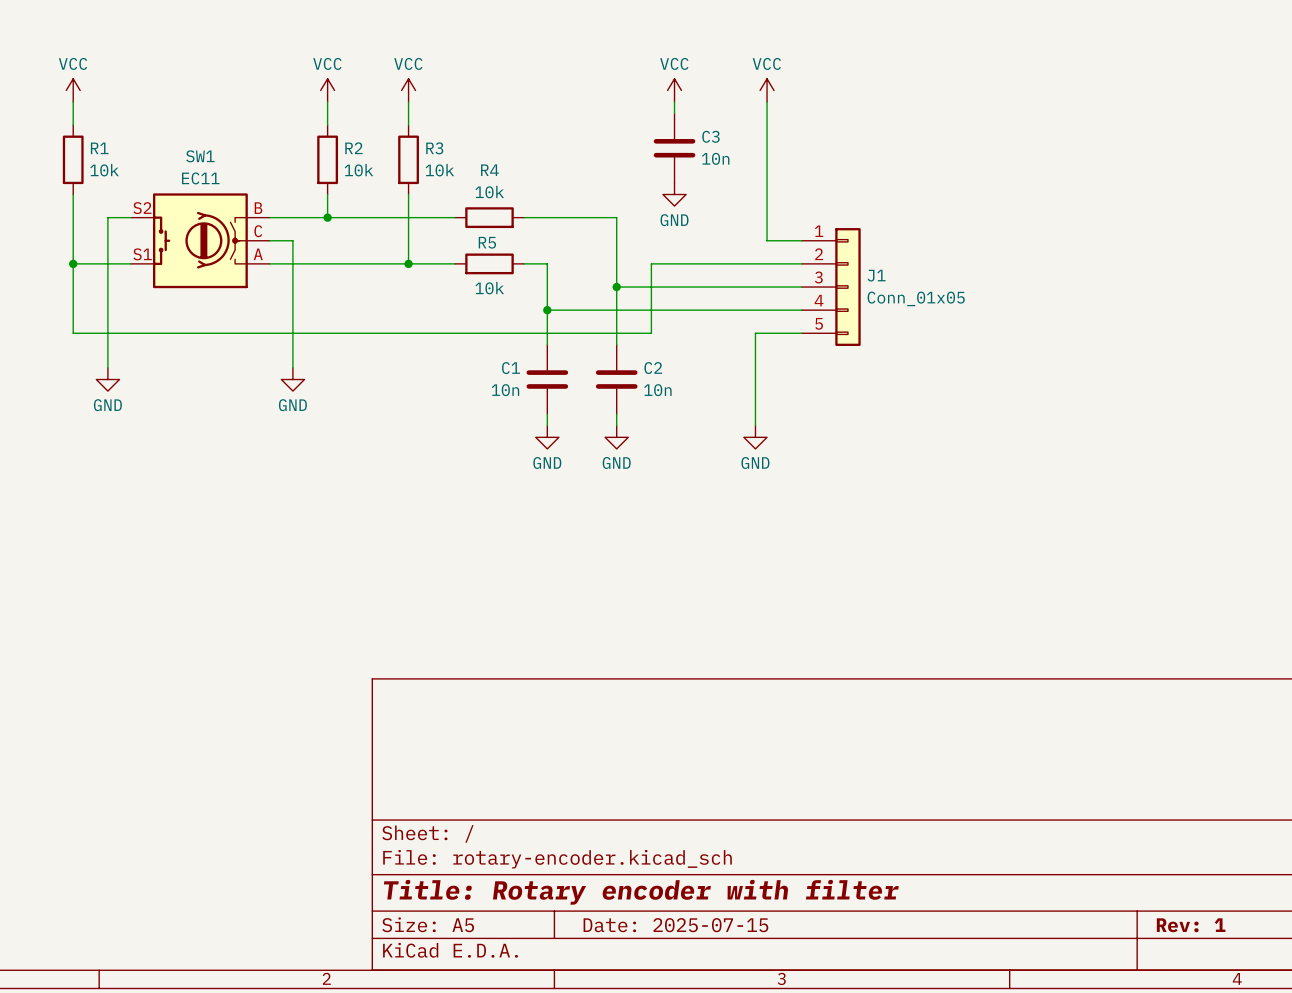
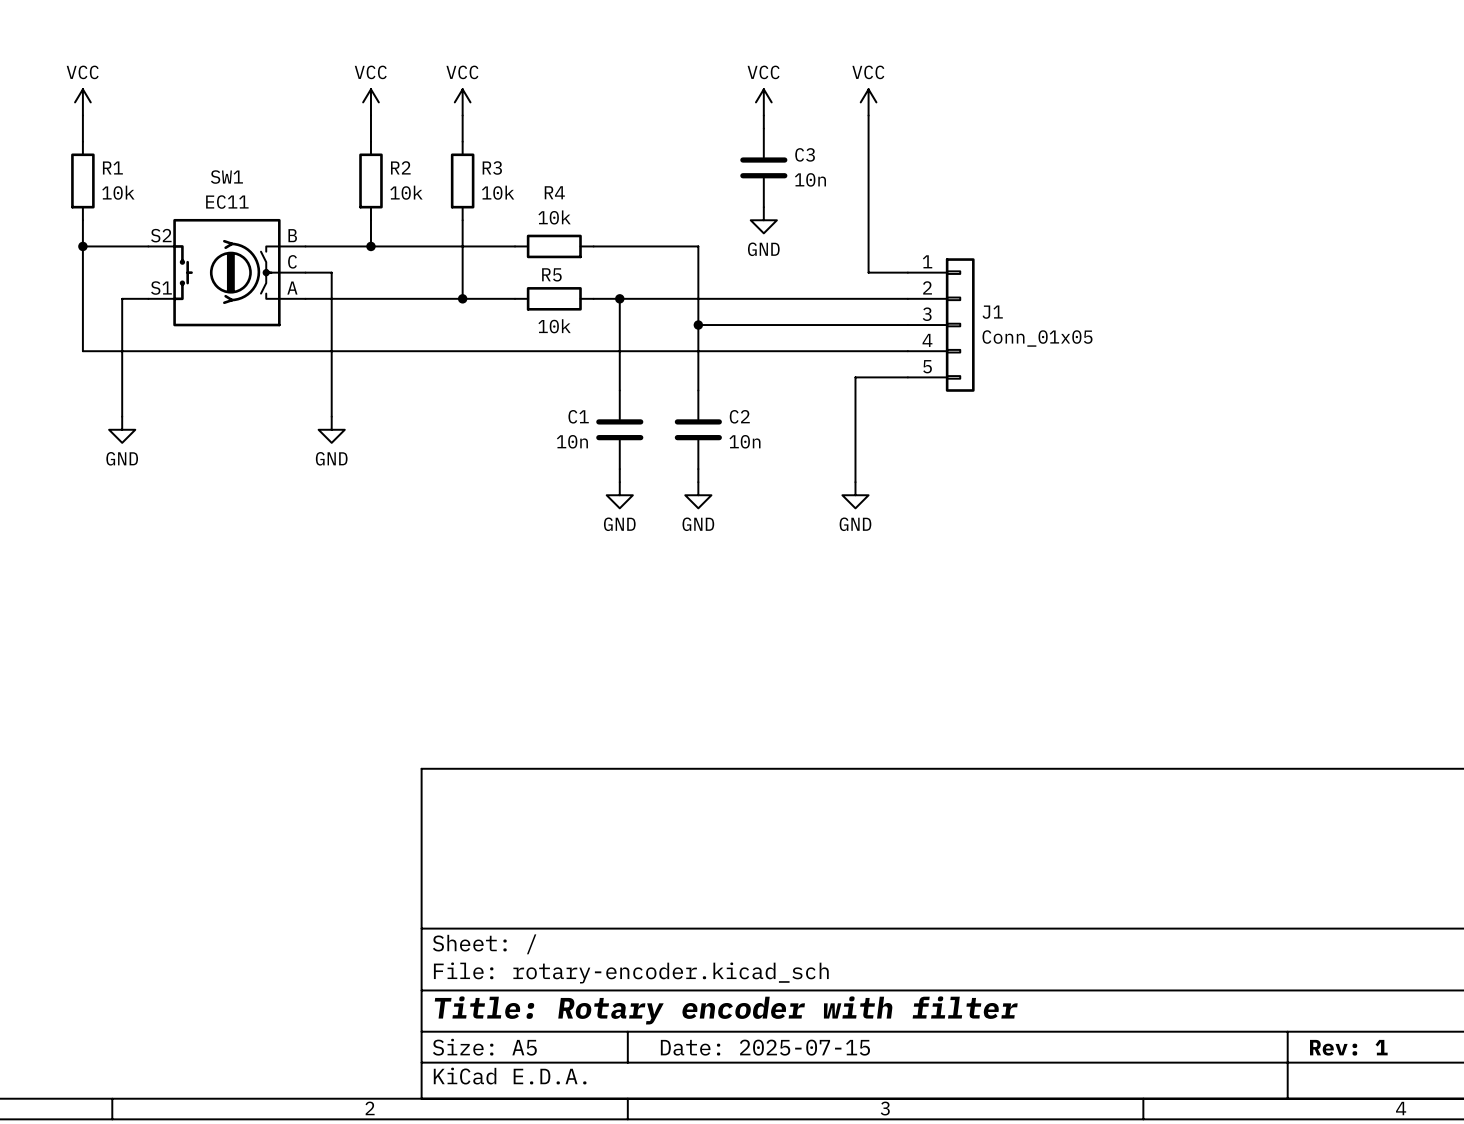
wire: (107, 217) (107, 263) (73, 263) -> (122, 246) (82, 246)
junction position: (73, 263) -> (82, 246)
wire: none -> (619, 298) (737, 298)
wire: (651, 263) (651, 333) (73, 333) (73, 310) -> (619, 351) (82, 351)
junction position: (547, 310) -> (619, 298)

